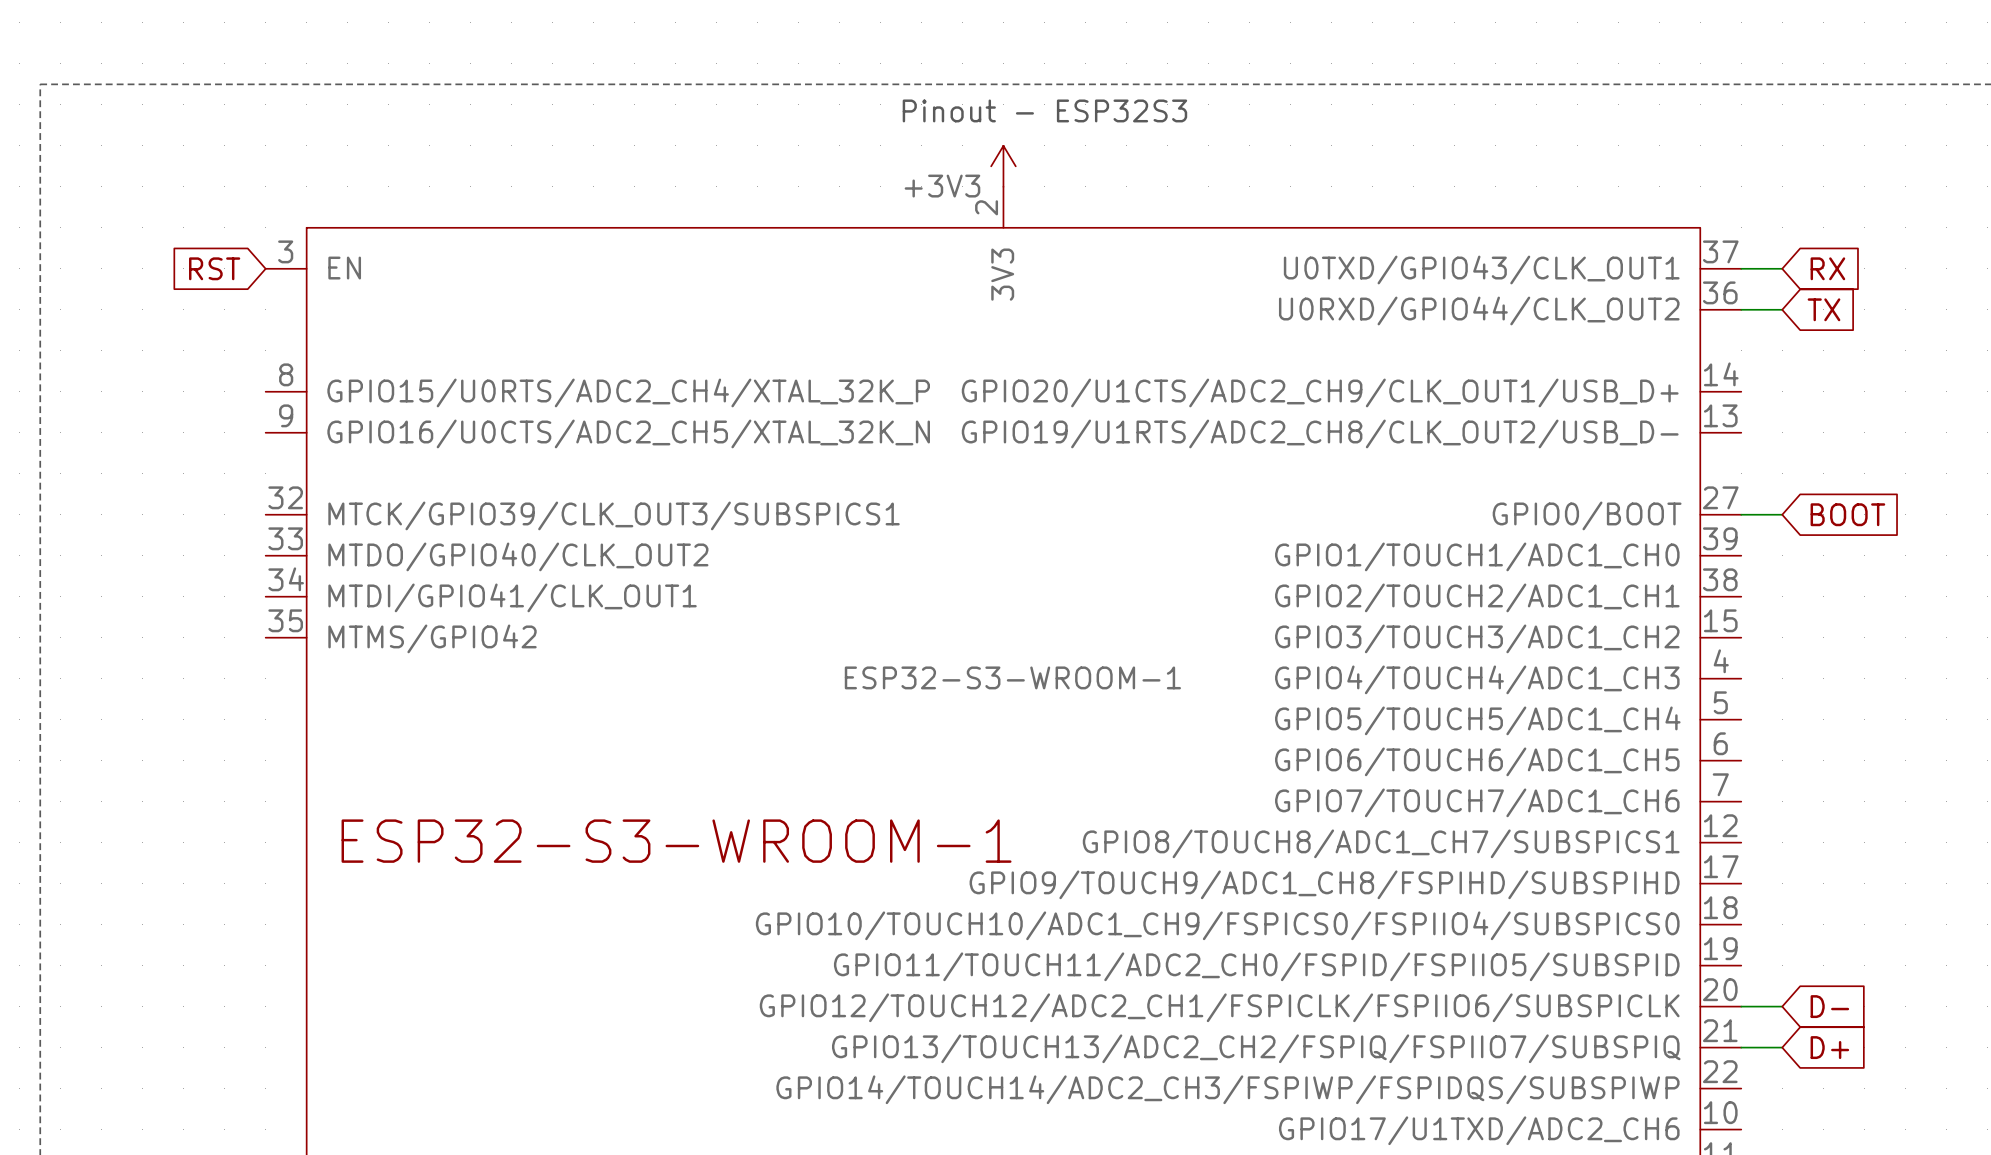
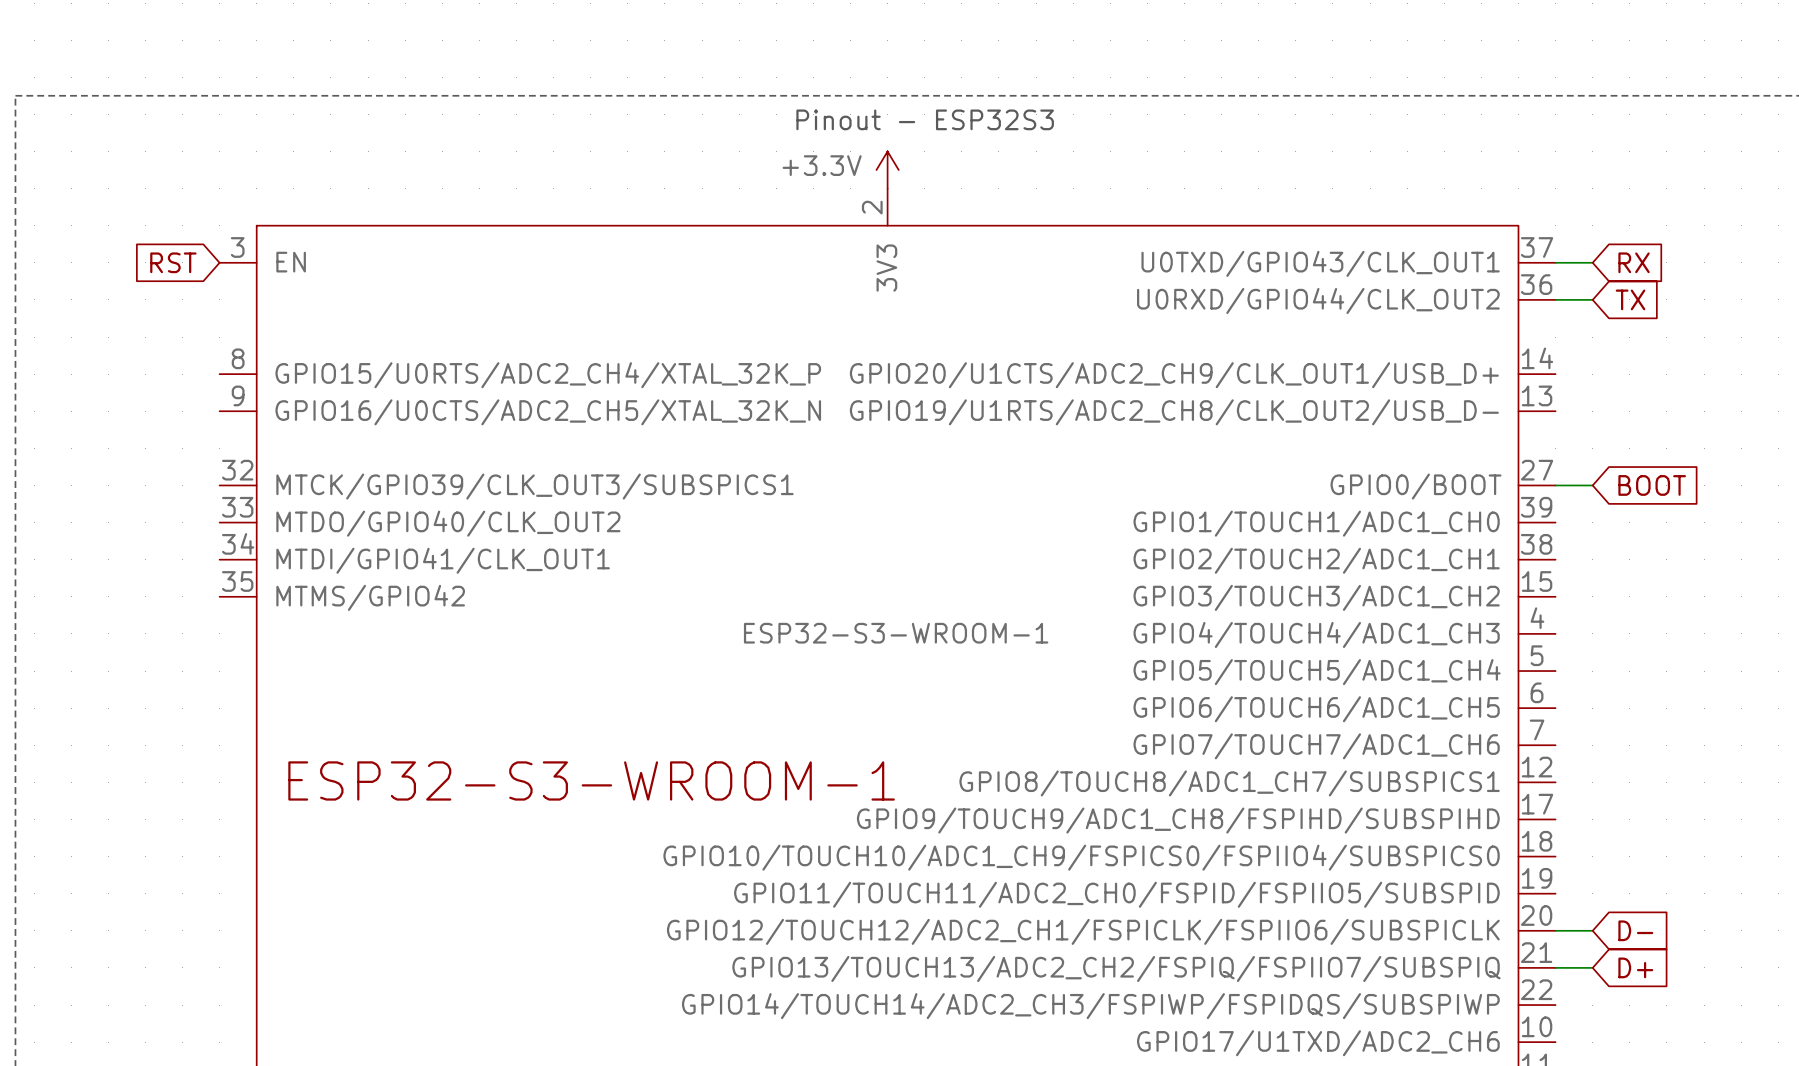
power symbol: +3V3 (1003, 166) -> +3.3V (887, 170)

